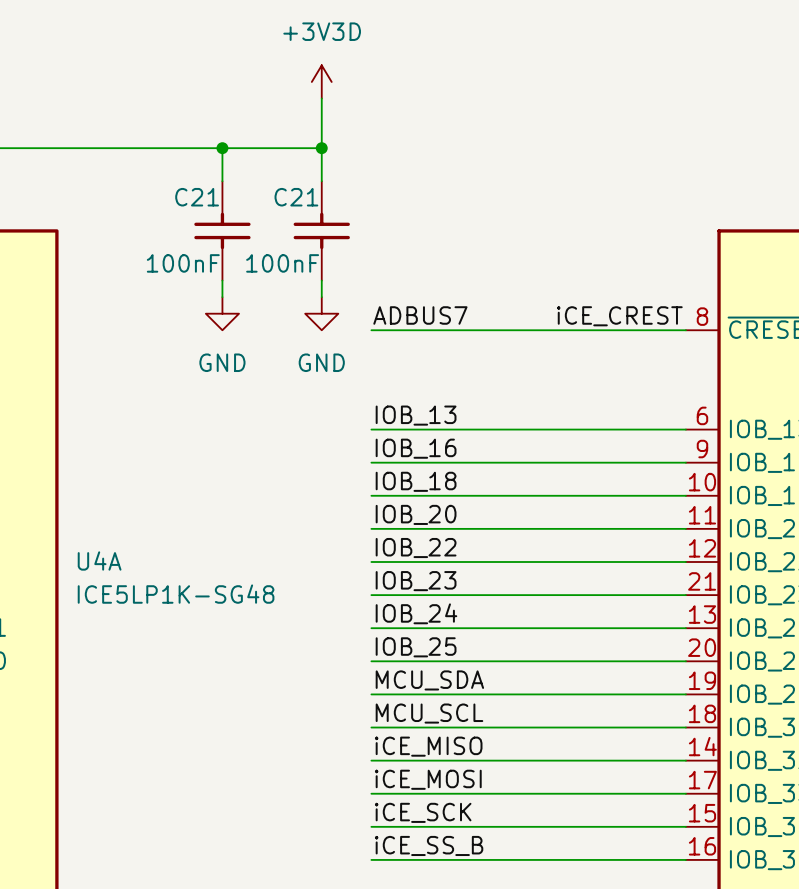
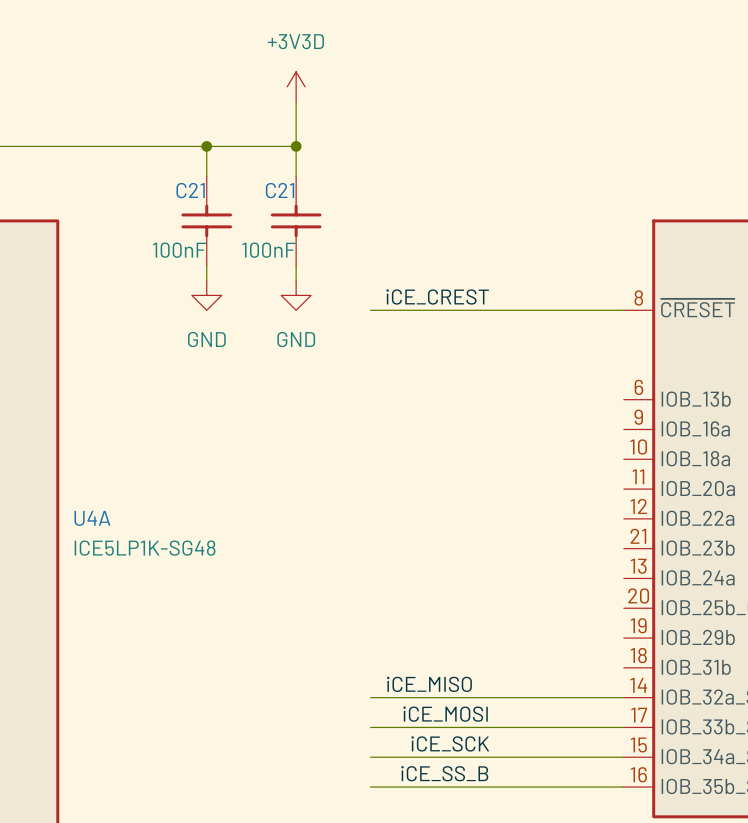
label: ADBUS7 (420, 315) -> none
label position: iCE_CREST (619, 316) -> iCE_CREST (437, 296)
wire: (371, 330) (404, 330) -> none
label: IOB_13 (416, 415) -> none
wire: (371, 429) (685, 429) -> none
label: IOB_16 (416, 448) -> none
wire: (371, 462) (685, 462) -> none
label: IOB_18 (416, 481) -> none
wire: (371, 495) (685, 495) -> none
label: IOB_20 (416, 514) -> none
wire: (371, 528) (685, 528) -> none
label: IOB_22 (416, 548) -> none
wire: (371, 561) (685, 561) -> none
label: IOB_23 (416, 581) -> none
wire: (371, 595) (685, 595) -> none
label: IOB_24 (416, 613) -> none
wire: (371, 628) (685, 628) -> none
label: IOB_25 (416, 647) -> none
wire: (371, 661) (685, 661) -> none
label: MCU_SDA (429, 680) -> none
wire: (371, 694) (685, 694) -> none
label: MCU_SCL (429, 713) -> none
wire: (371, 727) (685, 727) -> none
label position: iCE_MISO (428, 746) -> iCE_MISO (429, 684)
wire: (371, 760) (404, 760) -> none
label position: iCE_MOSI (428, 779) -> iCE_MOSI (445, 714)
wire: (371, 793) (404, 793) -> none
label position: iCE_SCK (423, 812) -> iCE_SCK (450, 743)
wire: (371, 826) (404, 826) -> none
label position: iCE_SS_B (429, 845) -> iCE_SS_B (444, 773)
wire: (371, 859) (404, 859) -> none

